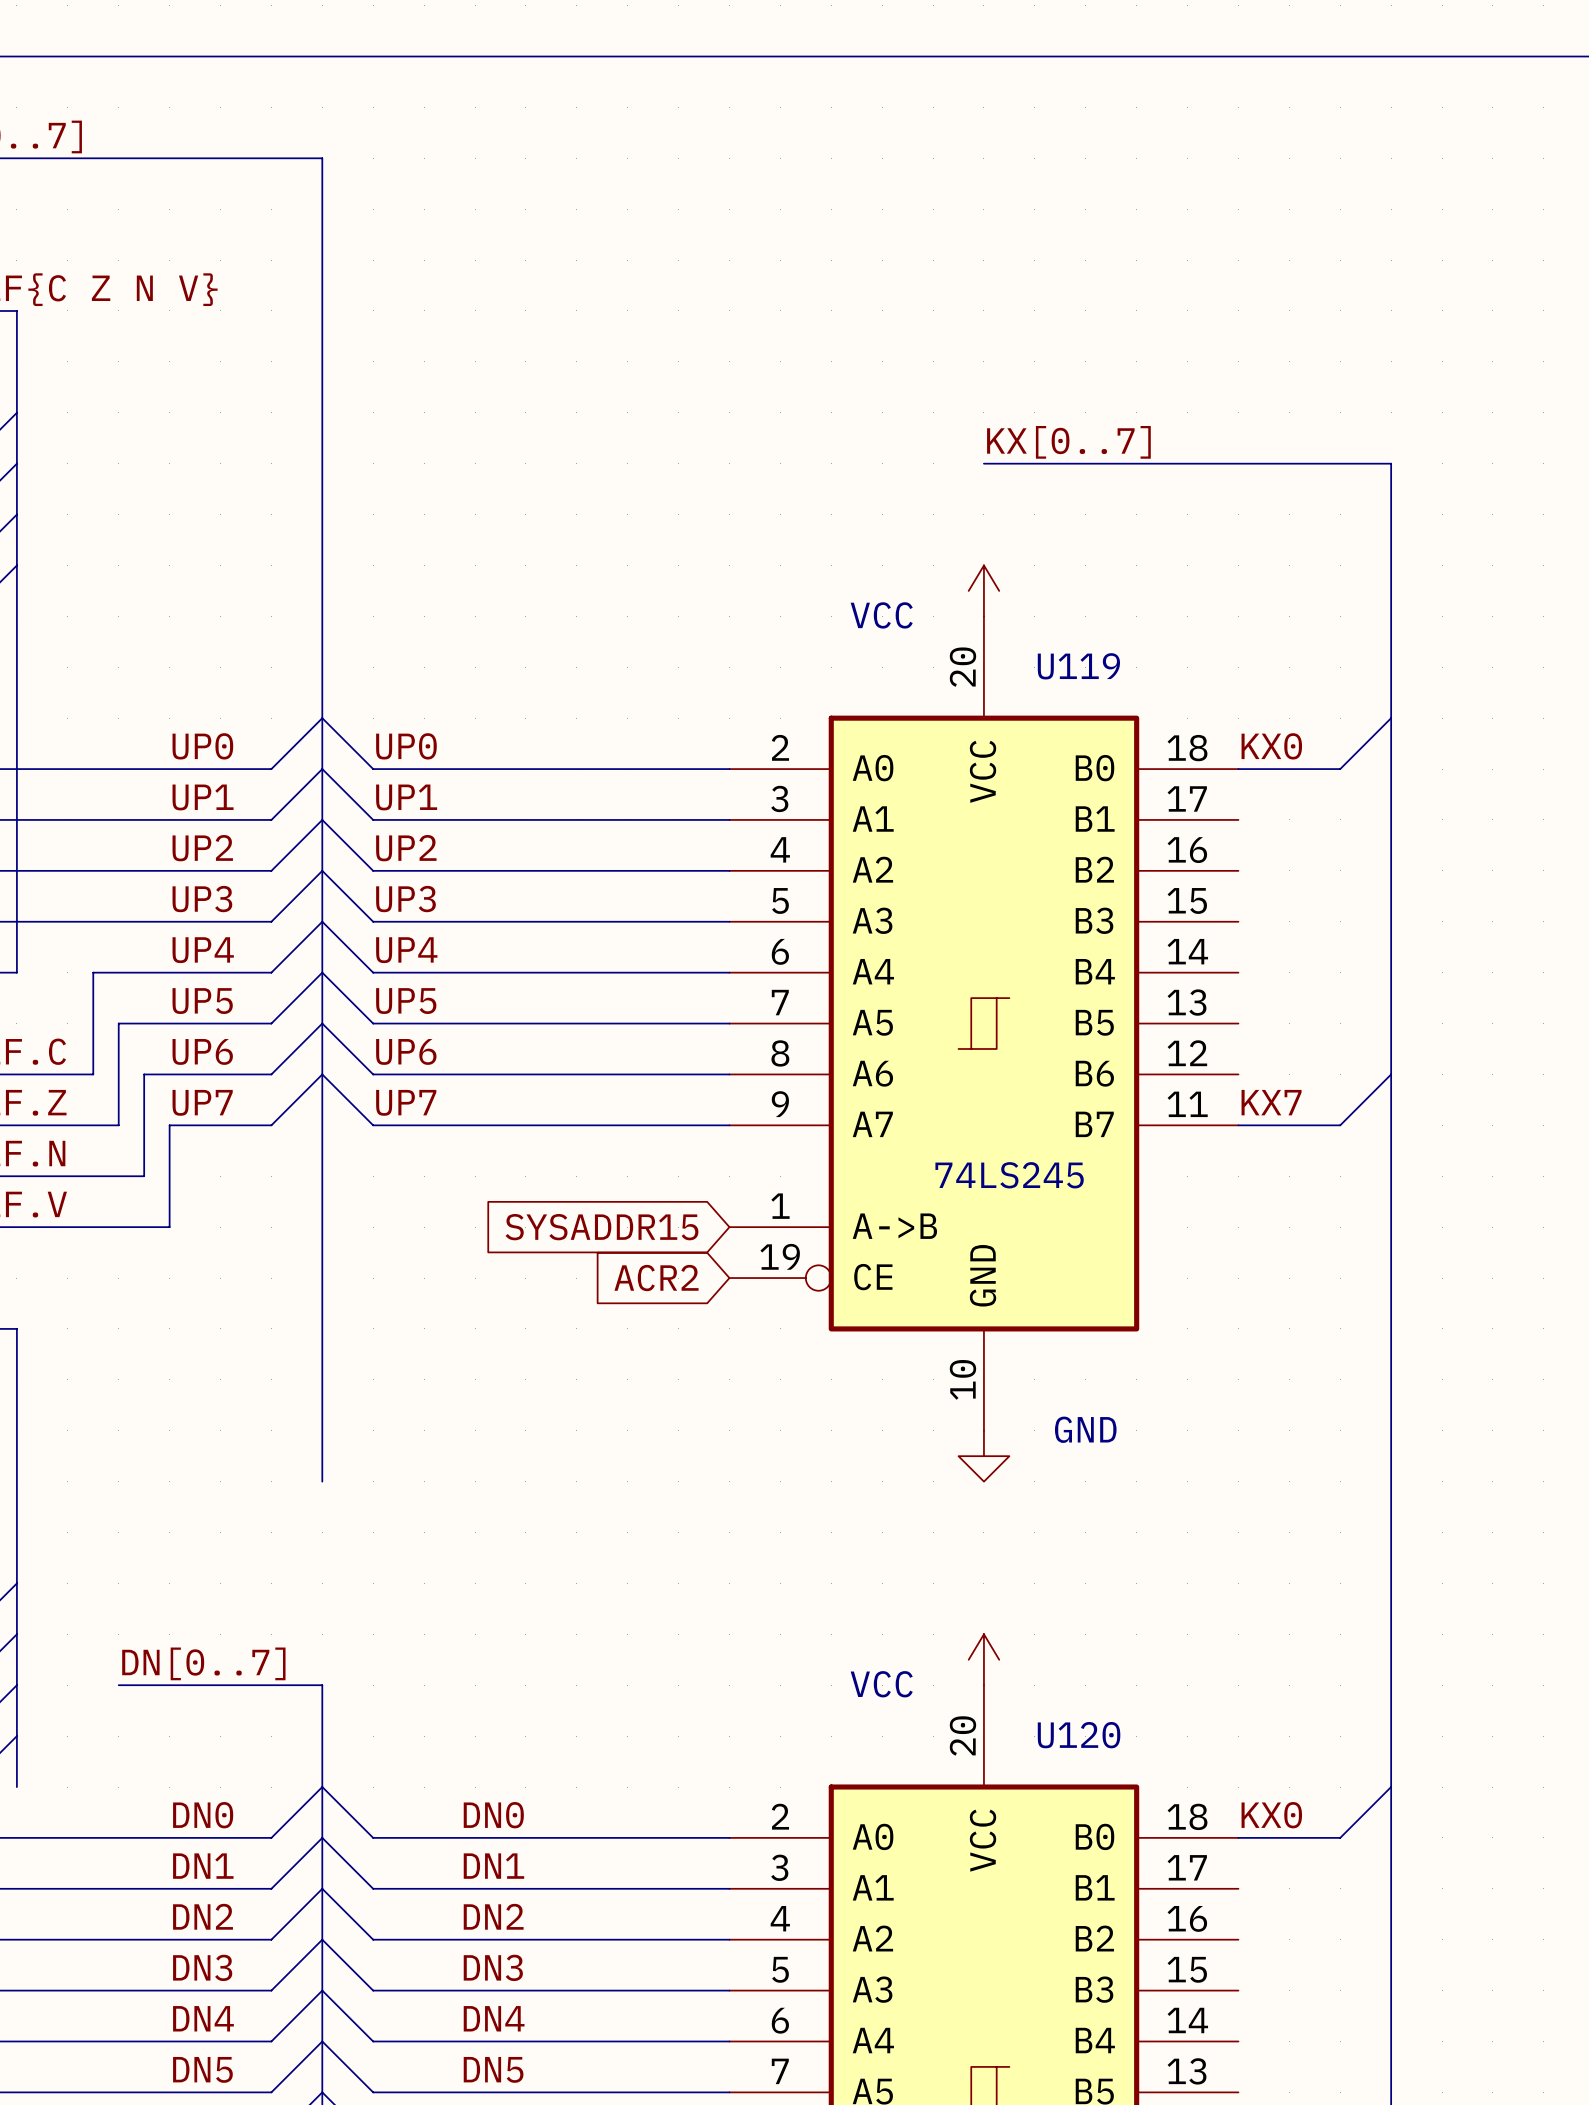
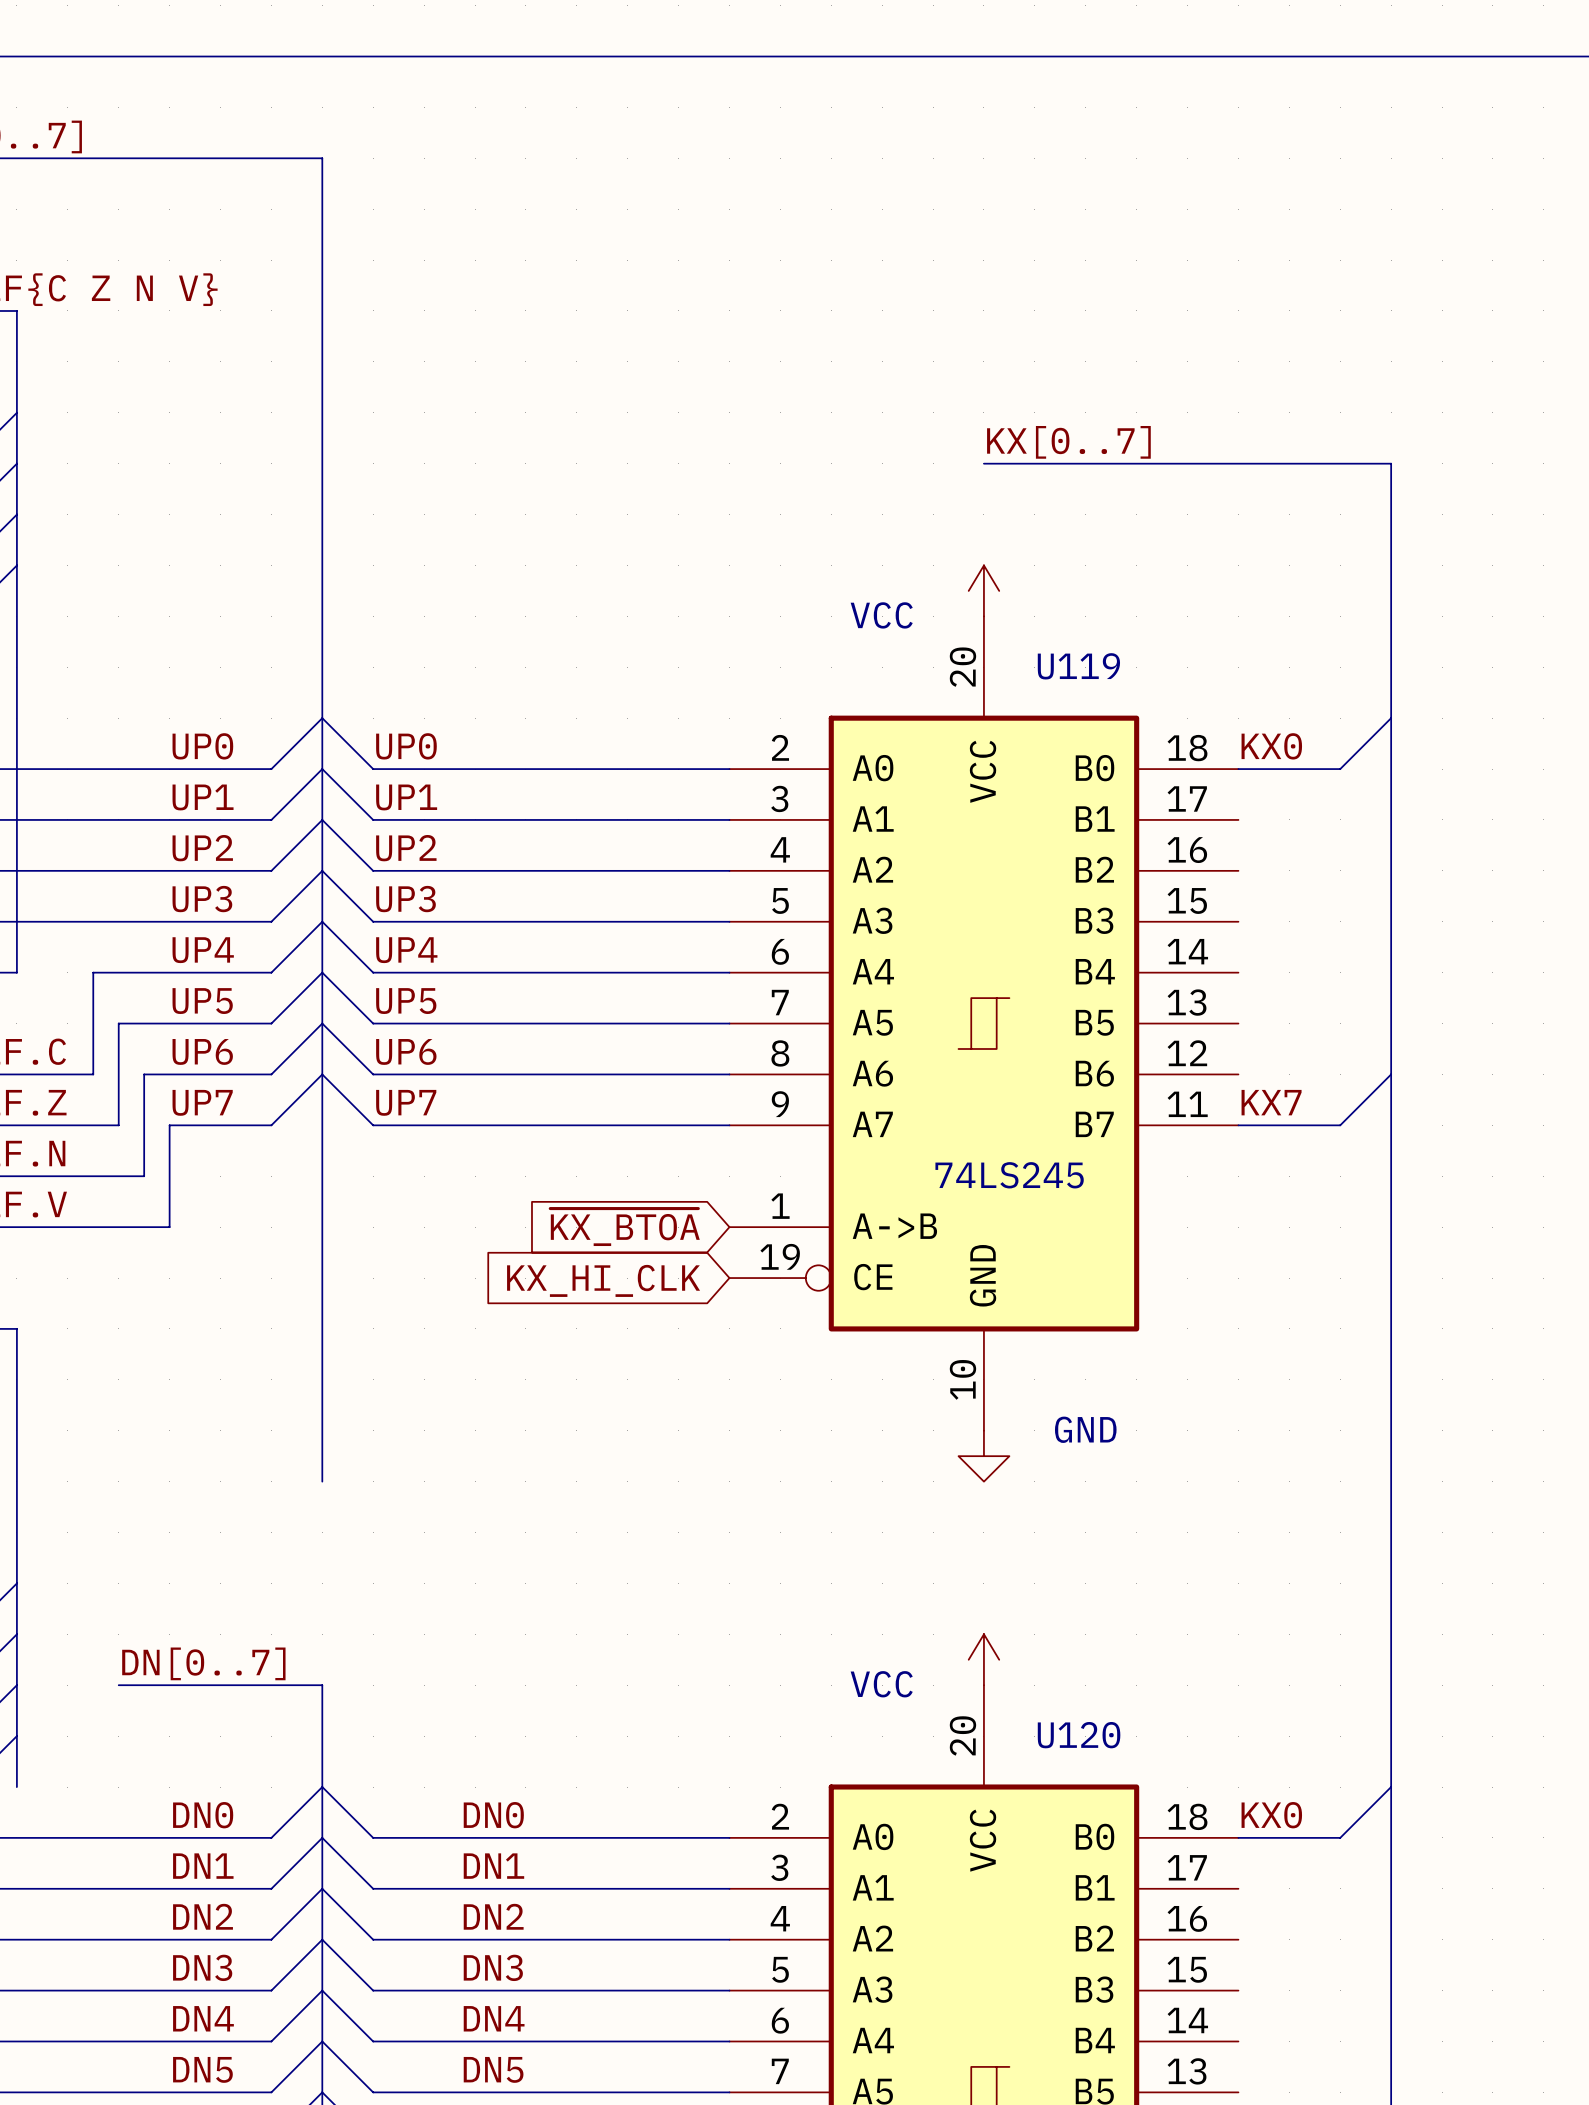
global label: SYSADDR15 (602, 1227) -> ~{KX_BTOA} (625, 1227)
global label: ACR2 (656, 1278) -> KX_HI_CLK (603, 1280)

